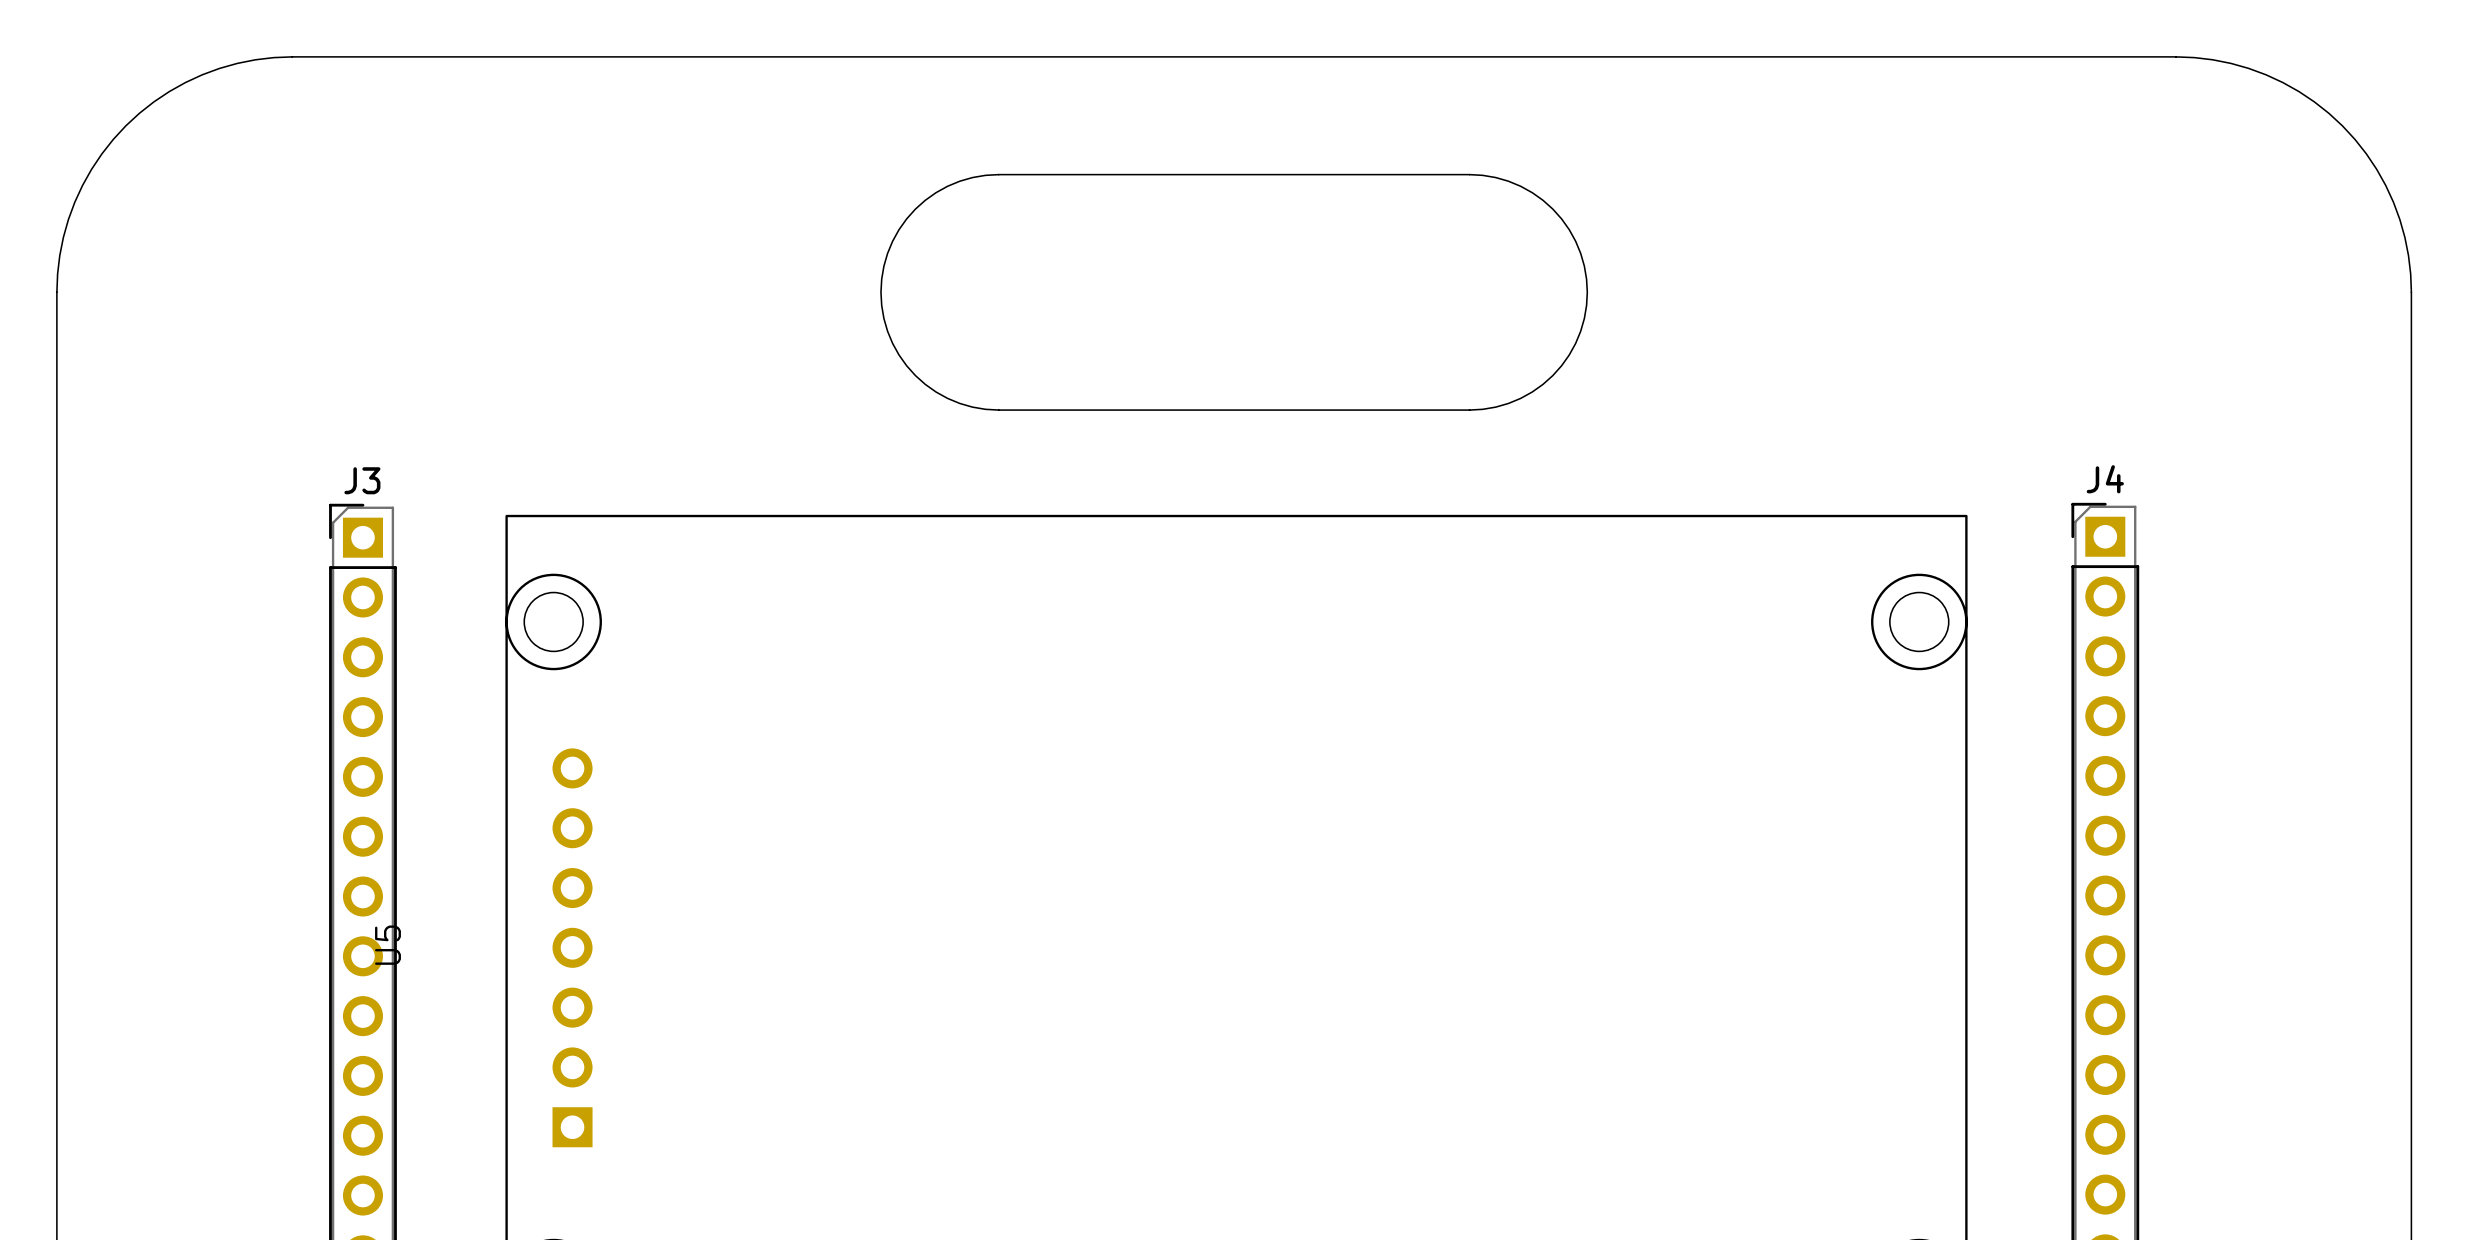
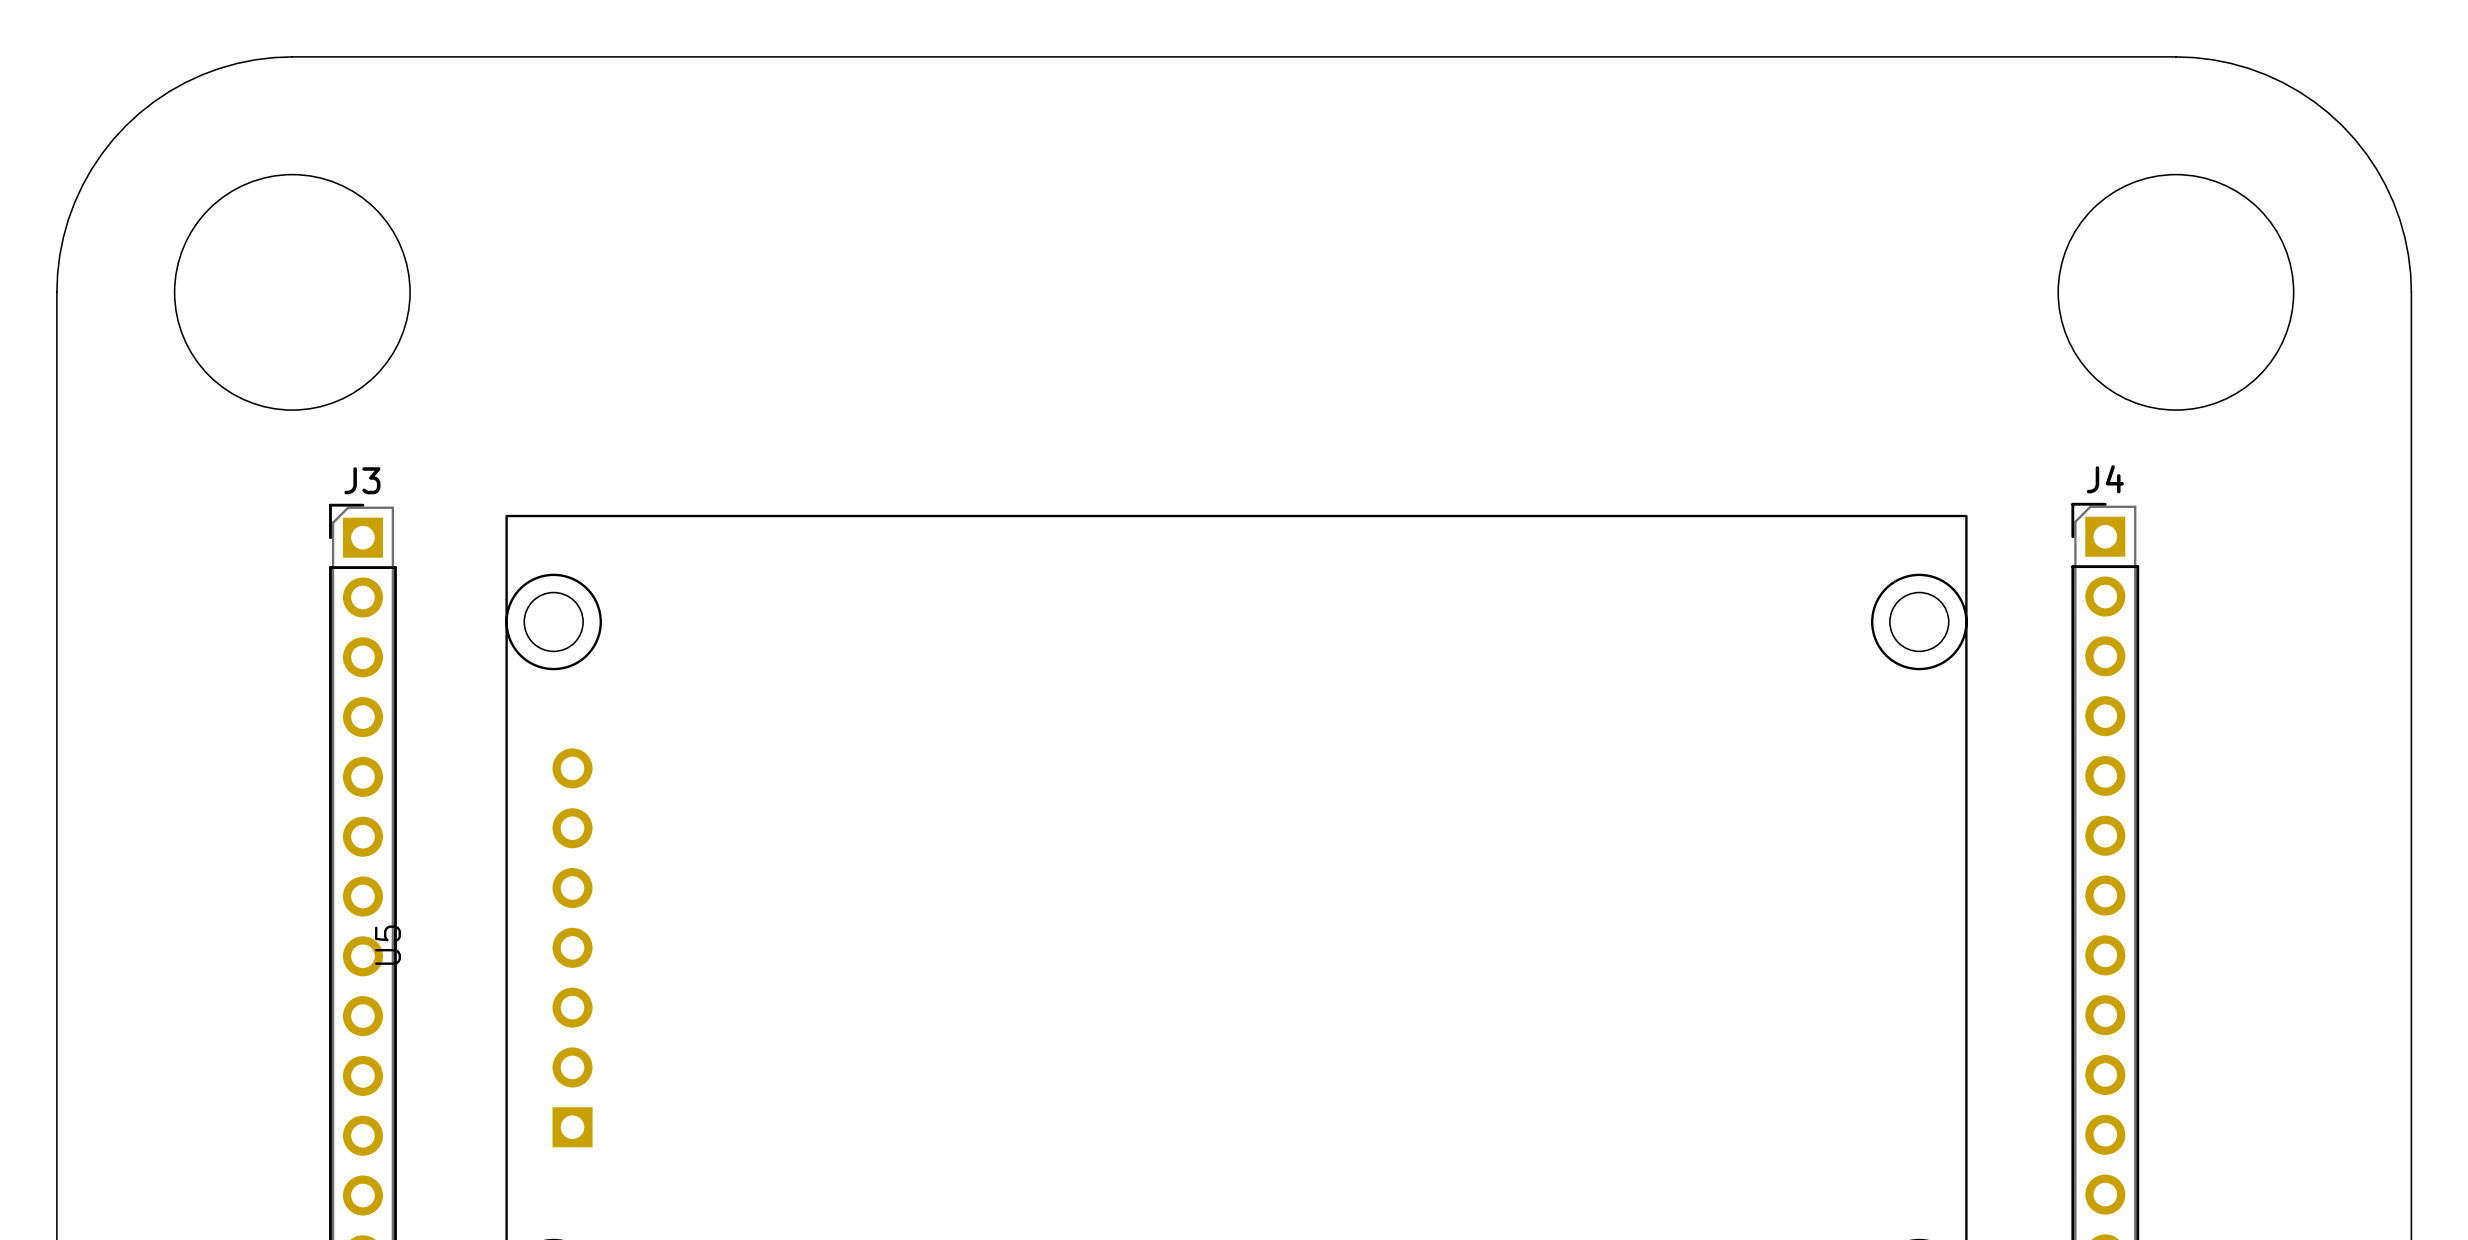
round board edge: none -> [174, 174, 411, 411]
board edge: (998, 174) (1469, 174) (1495, 177) (1520, 186) (1542, 200) (1569, 229) (1580, 253) (1586, 279) (1584, 318) (1569, 354) (1552, 375) (1520, 398) (1482, 409) (998, 410) (972, 407) (936, 392) (915, 375) (899, 354) (883, 318) (881, 279) (892, 241) (915, 209) (947, 186) (972, 177) (998, 174) -> none
round board edge: none -> [2057, 174, 2295, 411]

